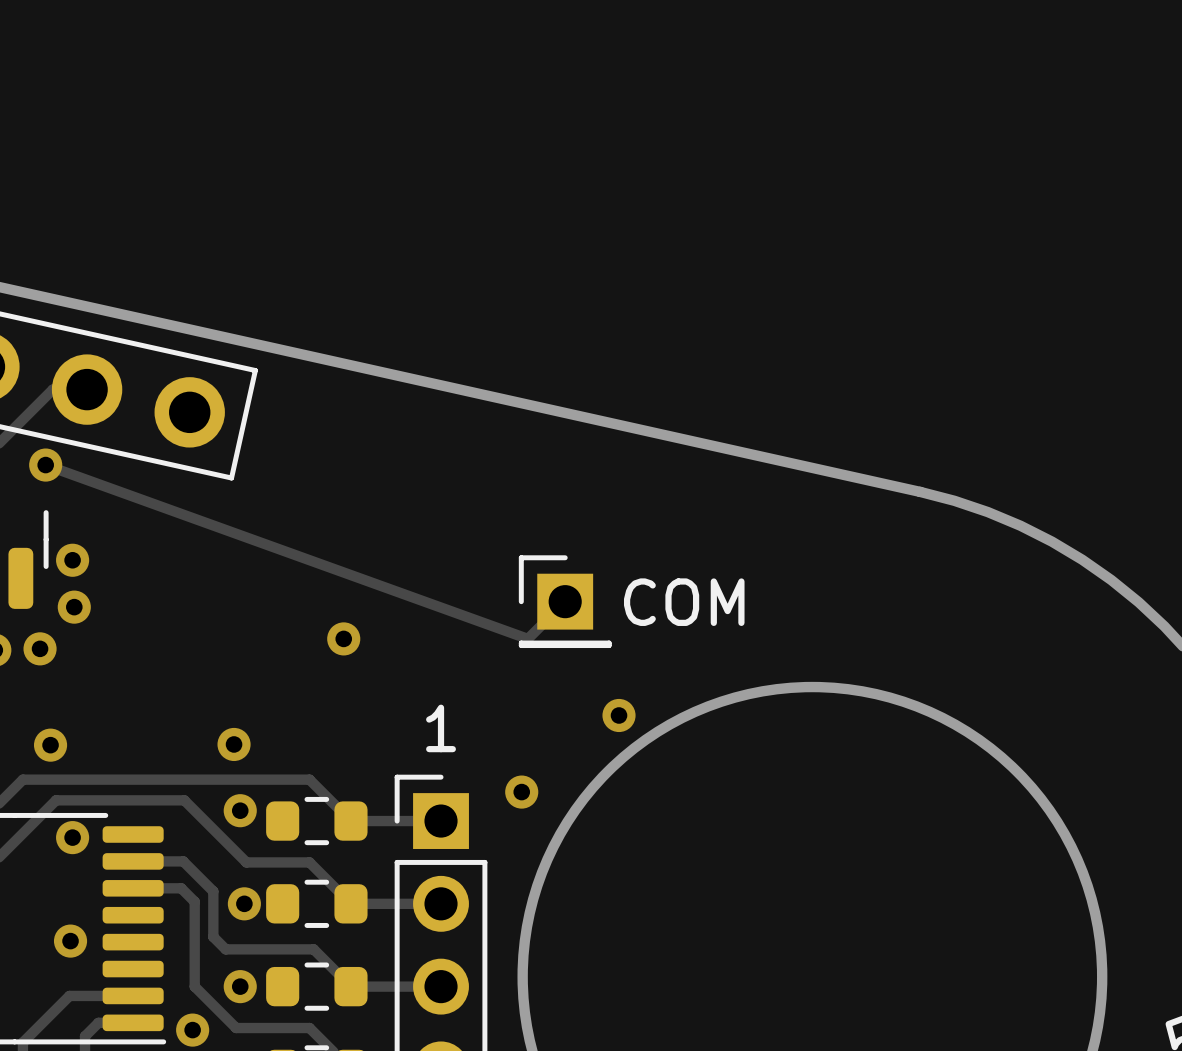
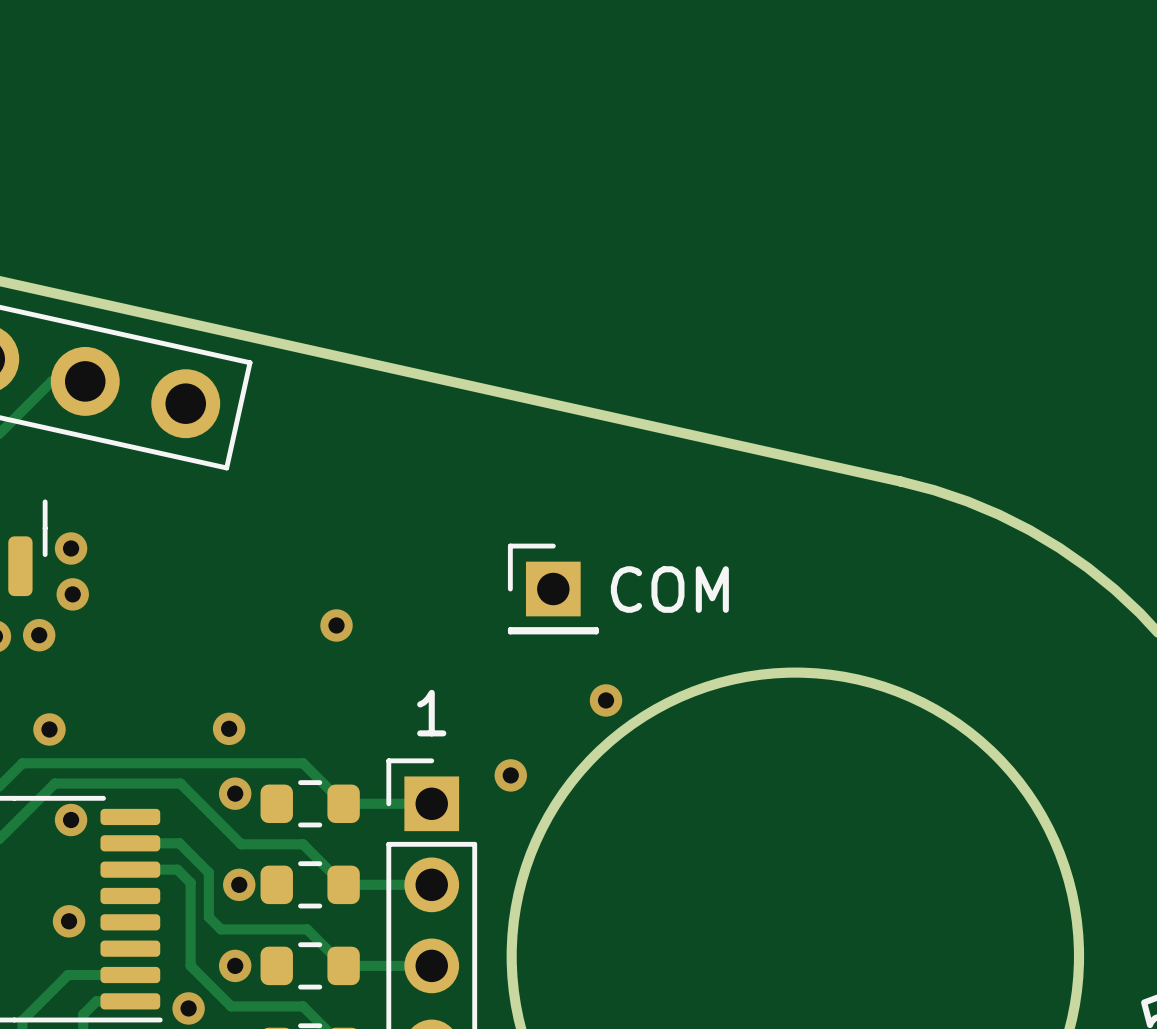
track: (45, 465) (527, 638) (565, 601) -> none
via: (45, 465) -> none

